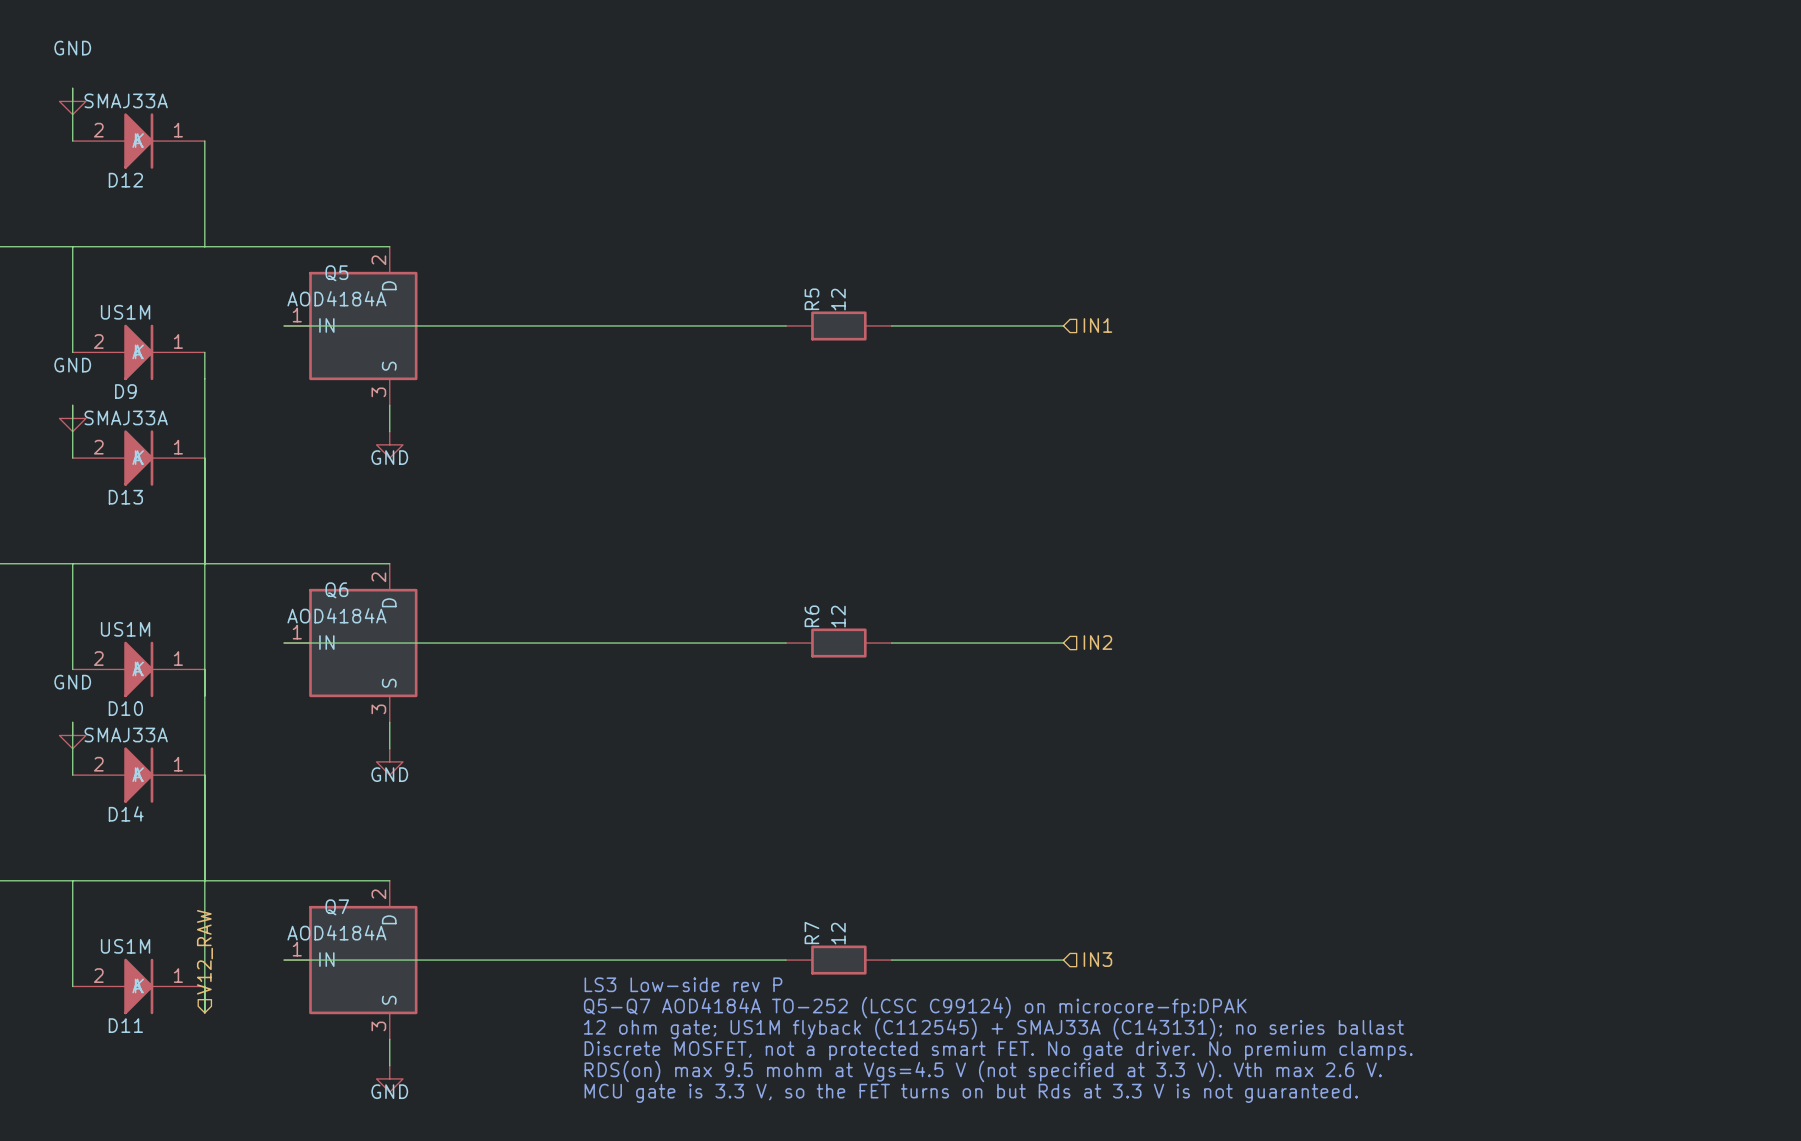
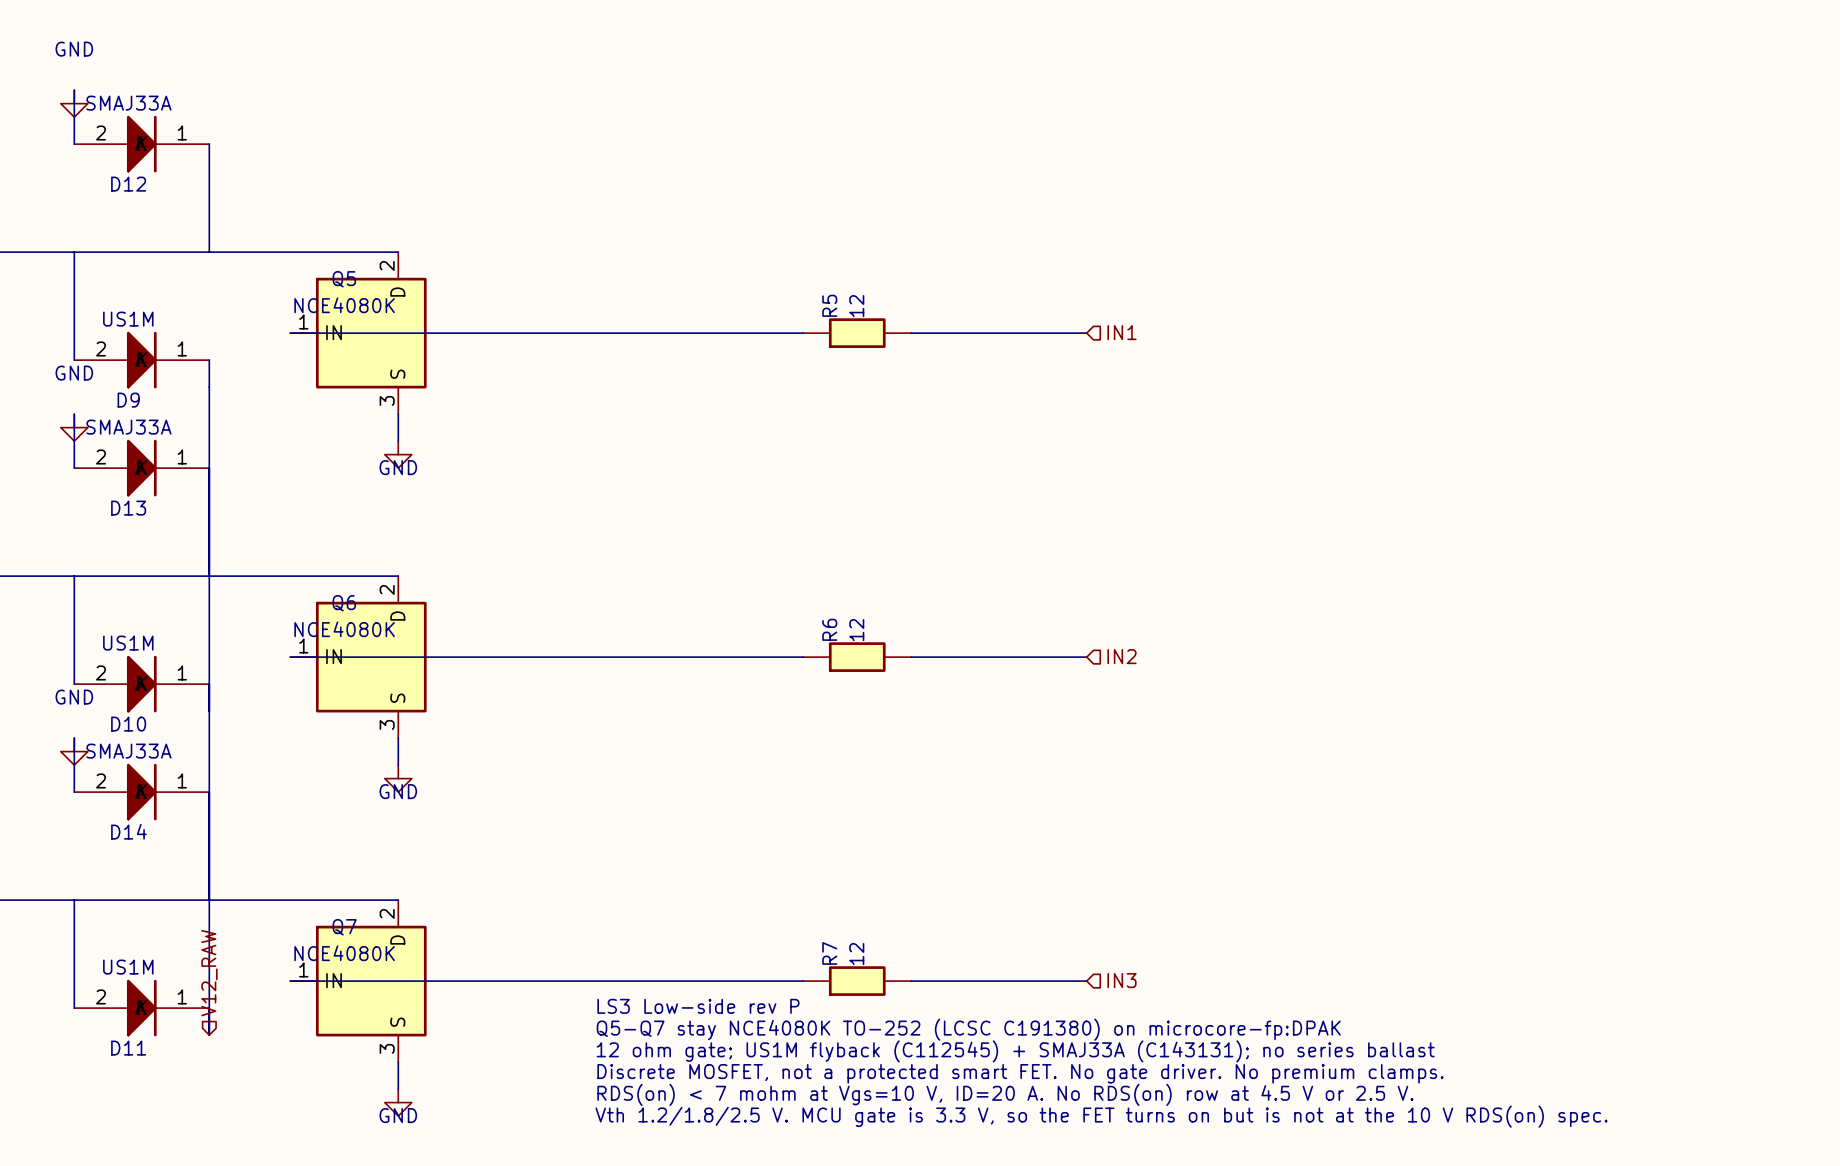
Q5 value: AOD4184A (336, 298) -> NCE4080K (344, 305)
Q6 value: AOD4184A (336, 615) -> NCE4080K (344, 629)
Q7 value: AOD4184A (336, 932) -> NCE4080K (344, 953)
text: Q5-Q7 AOD4184A TO-252 (LCSC C99124) on microcore-fp:DPAK (915, 1007) -> Q5-Q7 stay NCE4080K TO-252 (LCSC C191380) on microcore-fp:DPAK (968, 1029)
text: RDS(on) max 9.5 mohm at Vgs=4.5 V (not specified at 3.3 V). Vth max 2.6 V. (983, 1071) -> RDS(on) < 7 mohm at Vgs=10 V, ID=20 A. No RDS(on) row at 4.5 V or 2.5 V. (1005, 1094)
text: MCU gate is 3.3 V, so the FET turns on but Rds at 3.3 V is not guaranteed. (971, 1093) -> Vth 1.2/1.8/2.5 V. MCU gate is 3.3 V, so the FET turns on but is not at the 10 V RDS(on) spec. (1101, 1116)

